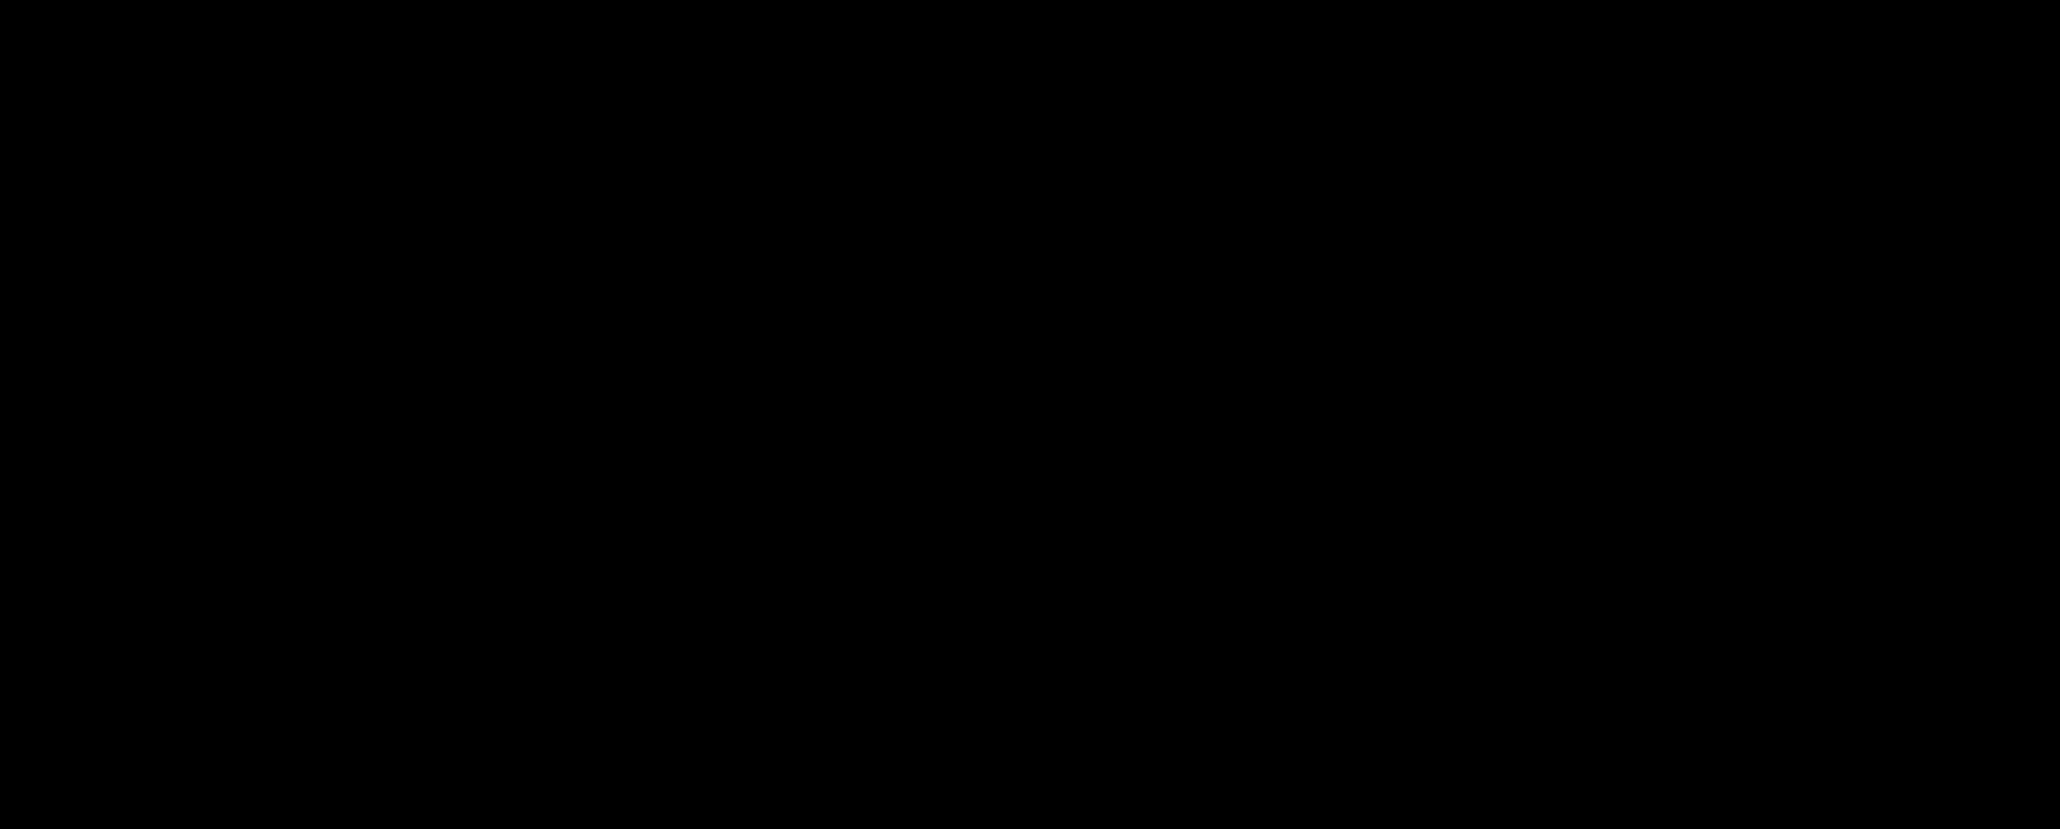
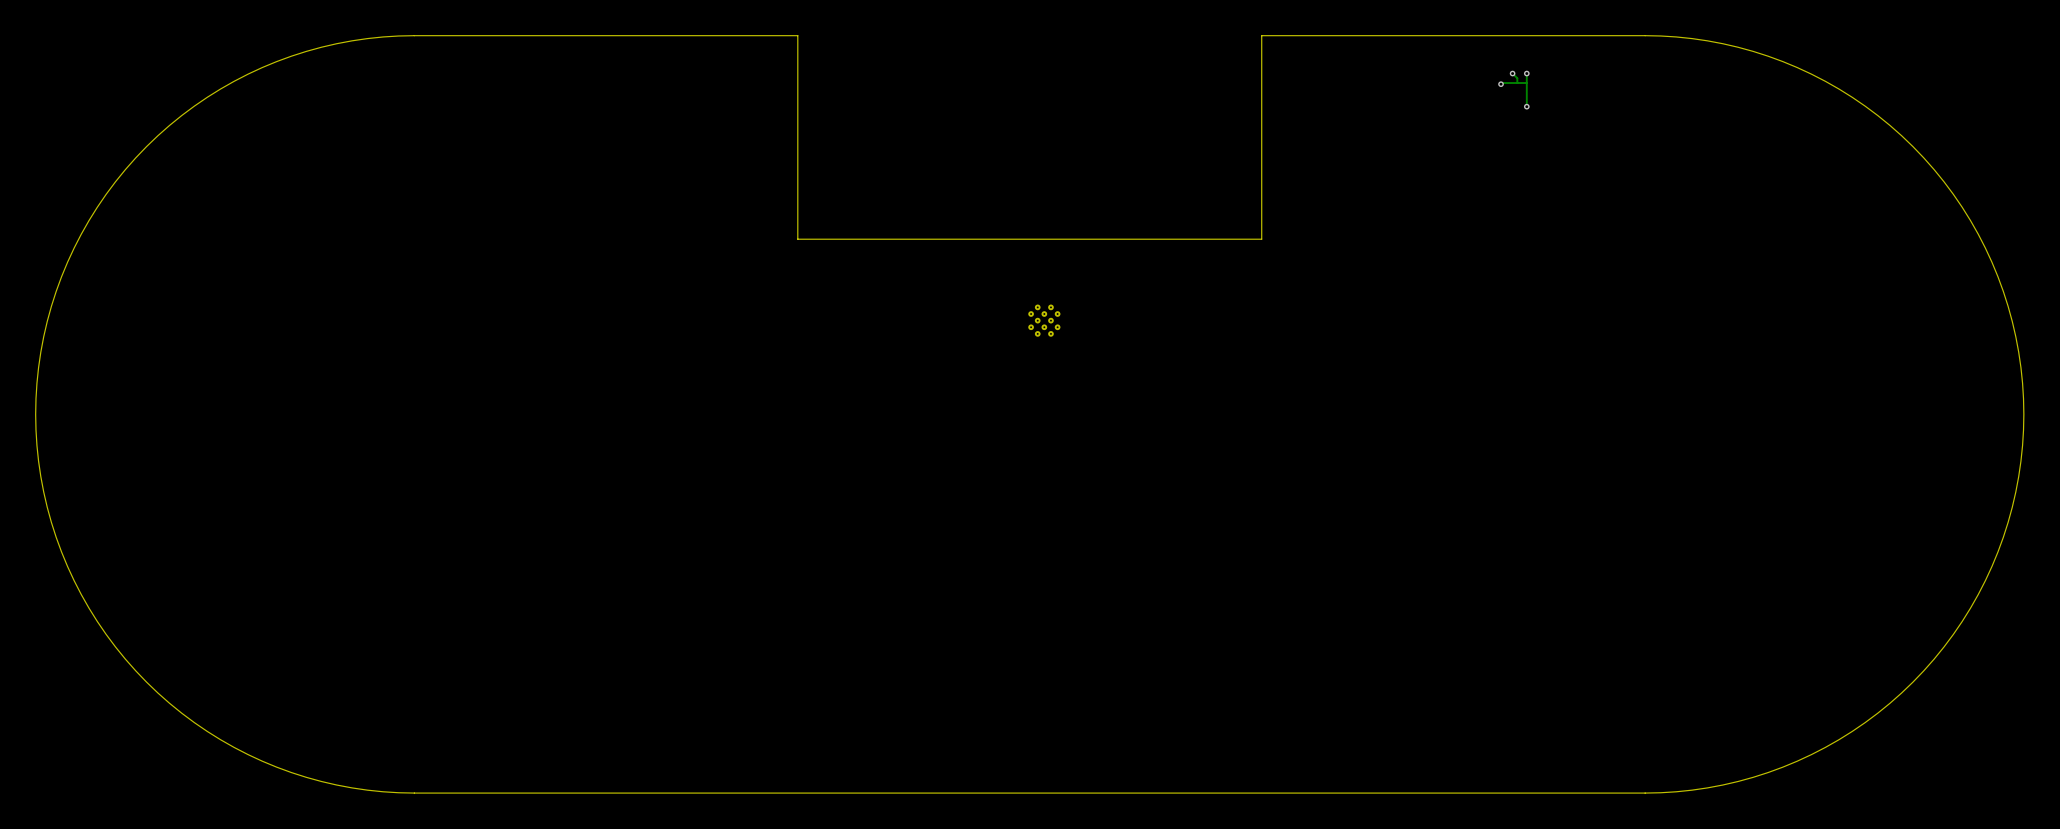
board edge: none -> (1645, 35) (1261, 35) (1261, 239) (797, 239) (797, 35) (398, 35) (352, 40) (306, 51) (276, 61) (234, 81) (181, 115) (157, 135) (125, 169) (97, 207) (81, 234) (67, 262) (51, 306) (38, 367) (35, 398) (36, 445) (40, 476) (51, 522) (74, 580) (97, 621) (125, 659) (157, 692) (194, 722) (248, 754) (306, 777) (352, 787) (414, 793) (1645, 793) (1707, 787) (1753, 777) (1782, 767) (1825, 747) (1877, 713) (1923, 670) (1953, 634) (1970, 608) (1991, 566) (2003, 537) (2018, 476) (2023, 414) (2018, 352) (2008, 306) (1997, 276) (1970, 220) (1934, 169) (1889, 125) (1839, 89) (1797, 67) (1768, 56) (1707, 40) (1645, 35)
track: none -> (1512, 73) (1517, 78) (1517, 83)
via: none -> (1512, 73)
track: none -> (1526, 73) (1526, 106)
via: none -> (1526, 73)
track: none -> (1526, 83) (1501, 84)
via: none -> (1501, 84)
via: none -> (1526, 106)
part: none -> (1044, 320)

